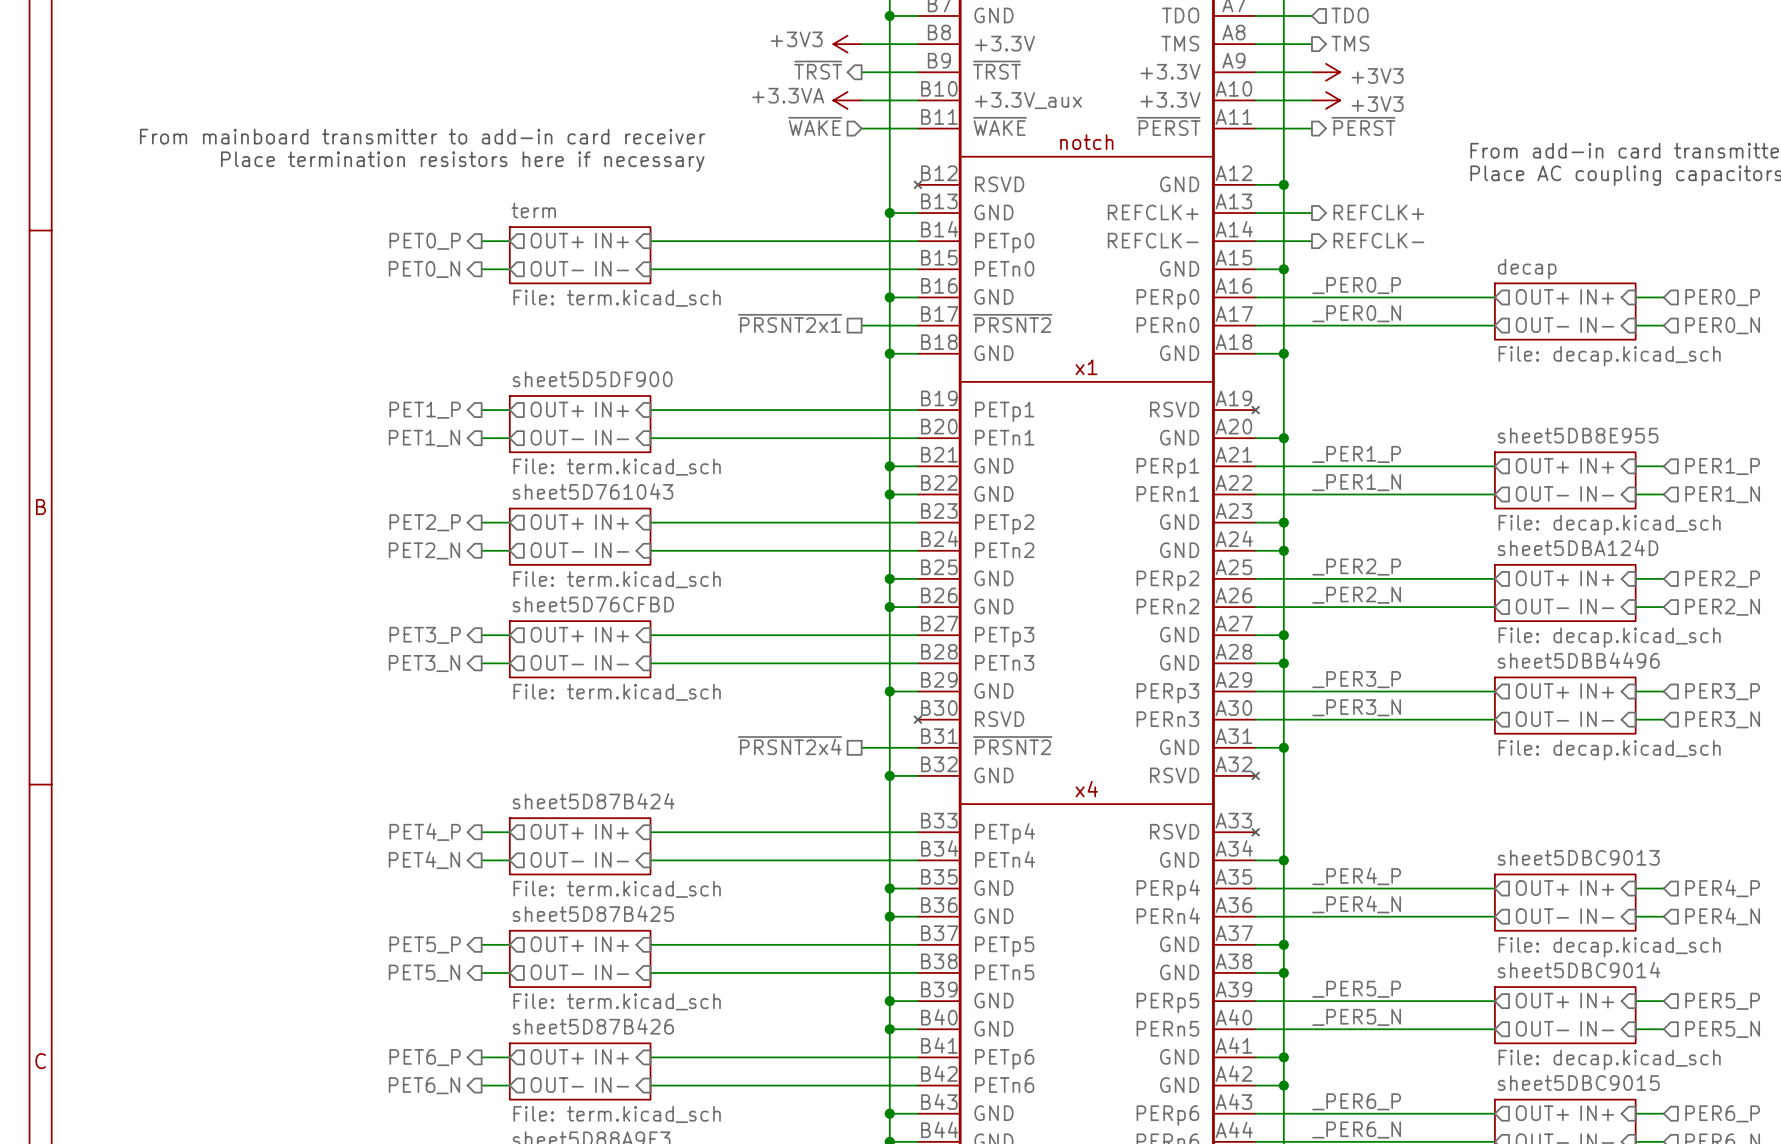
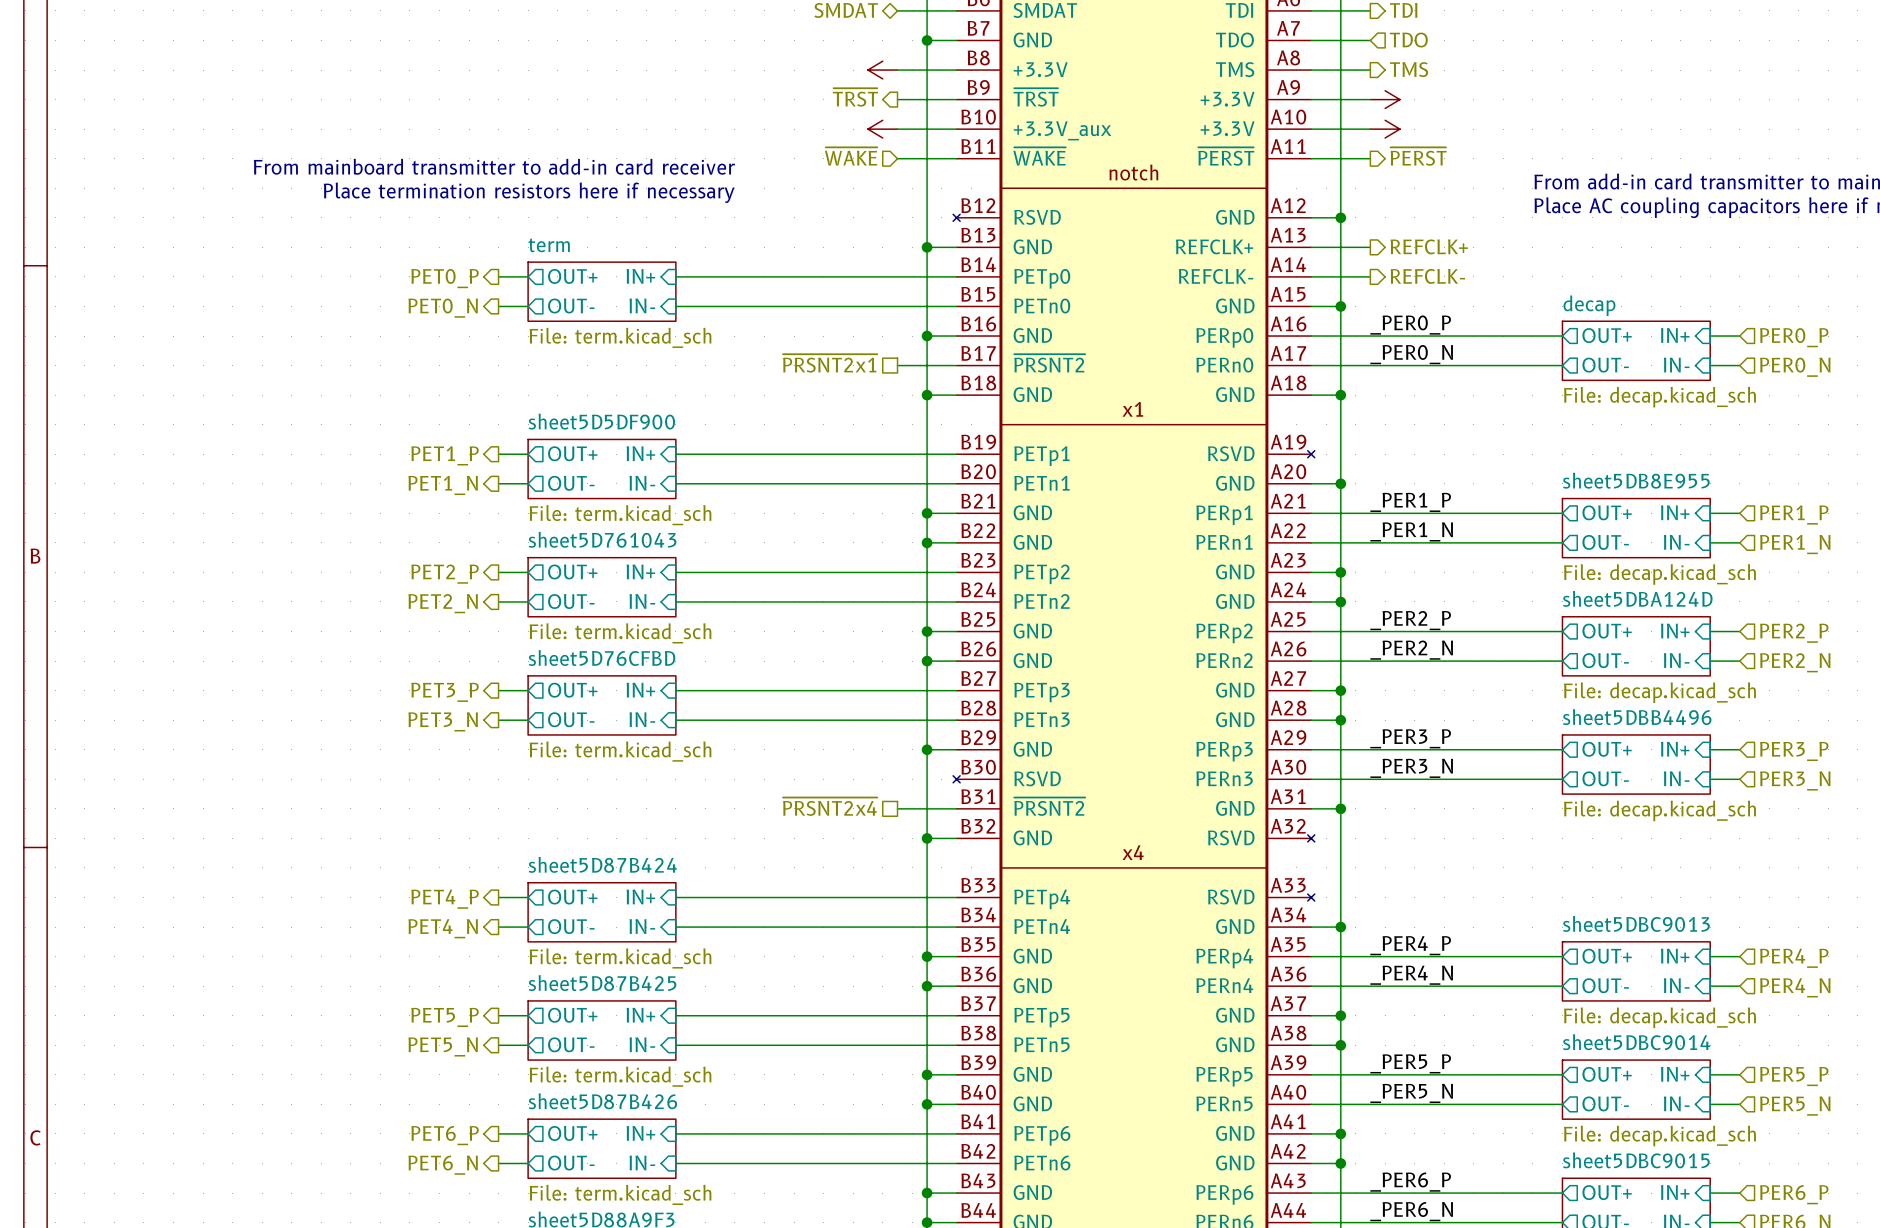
power symbol text: +3V3 (796, 39) -> none
power symbol text: +3V3 (1377, 75) -> none
power symbol text: +3.3VA (788, 95) -> none
power symbol text: +3V3 (1377, 104) -> none

